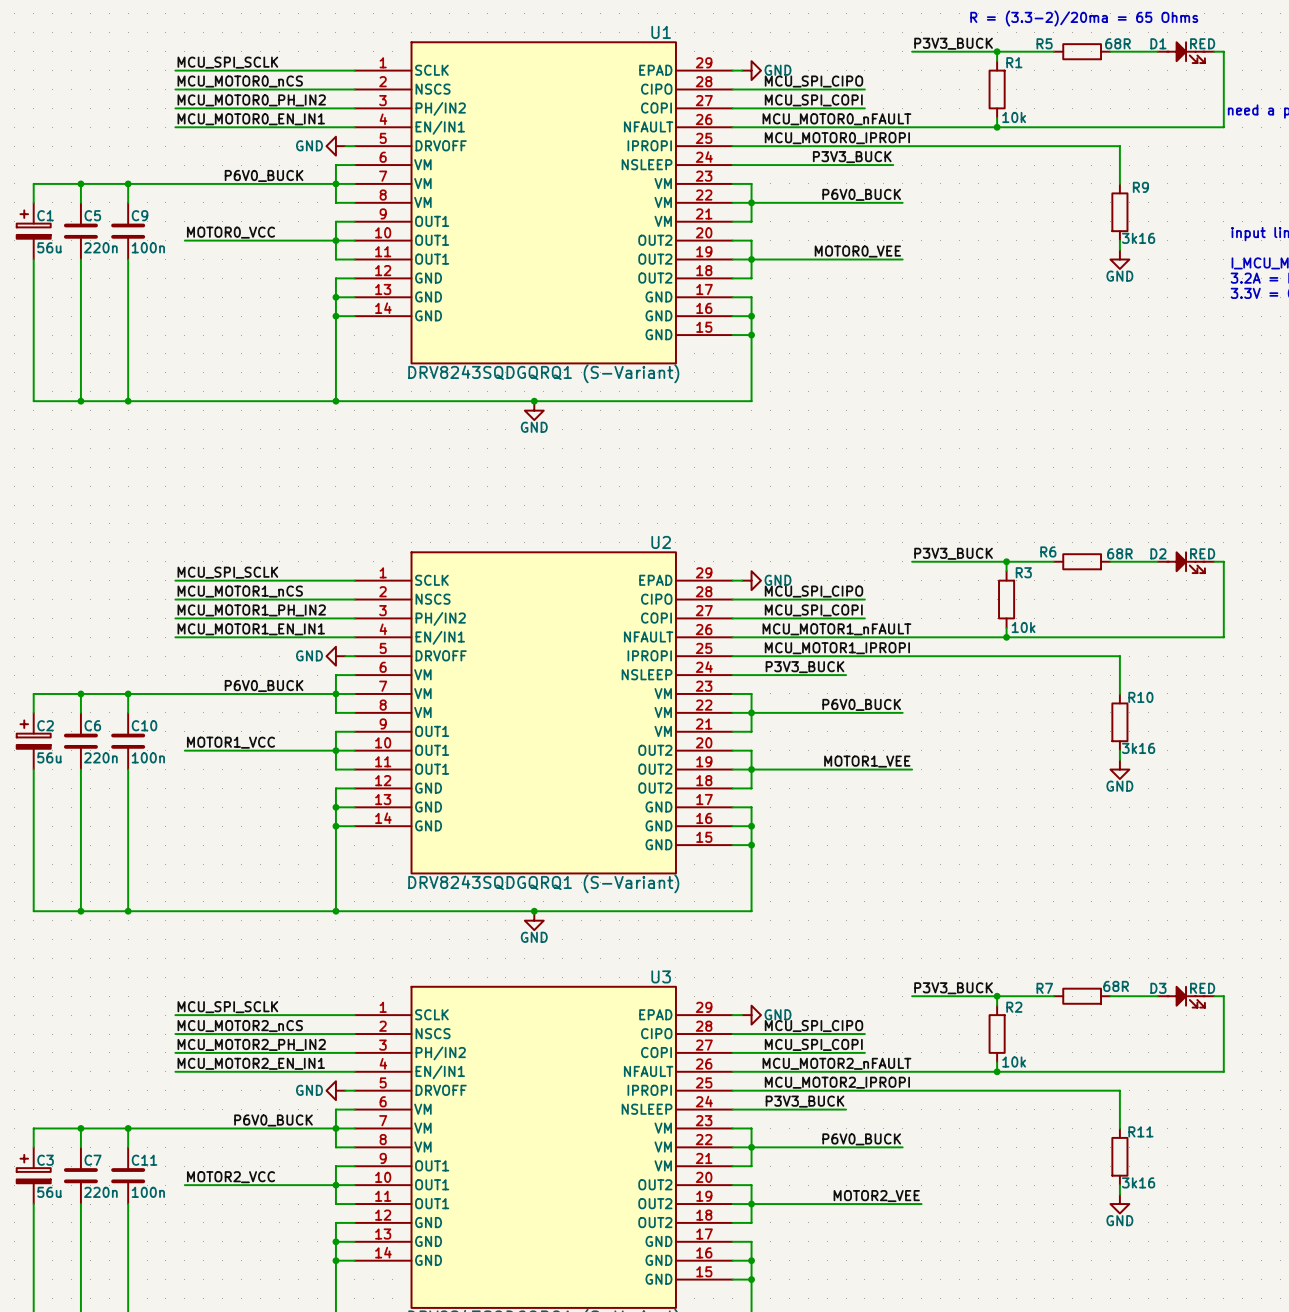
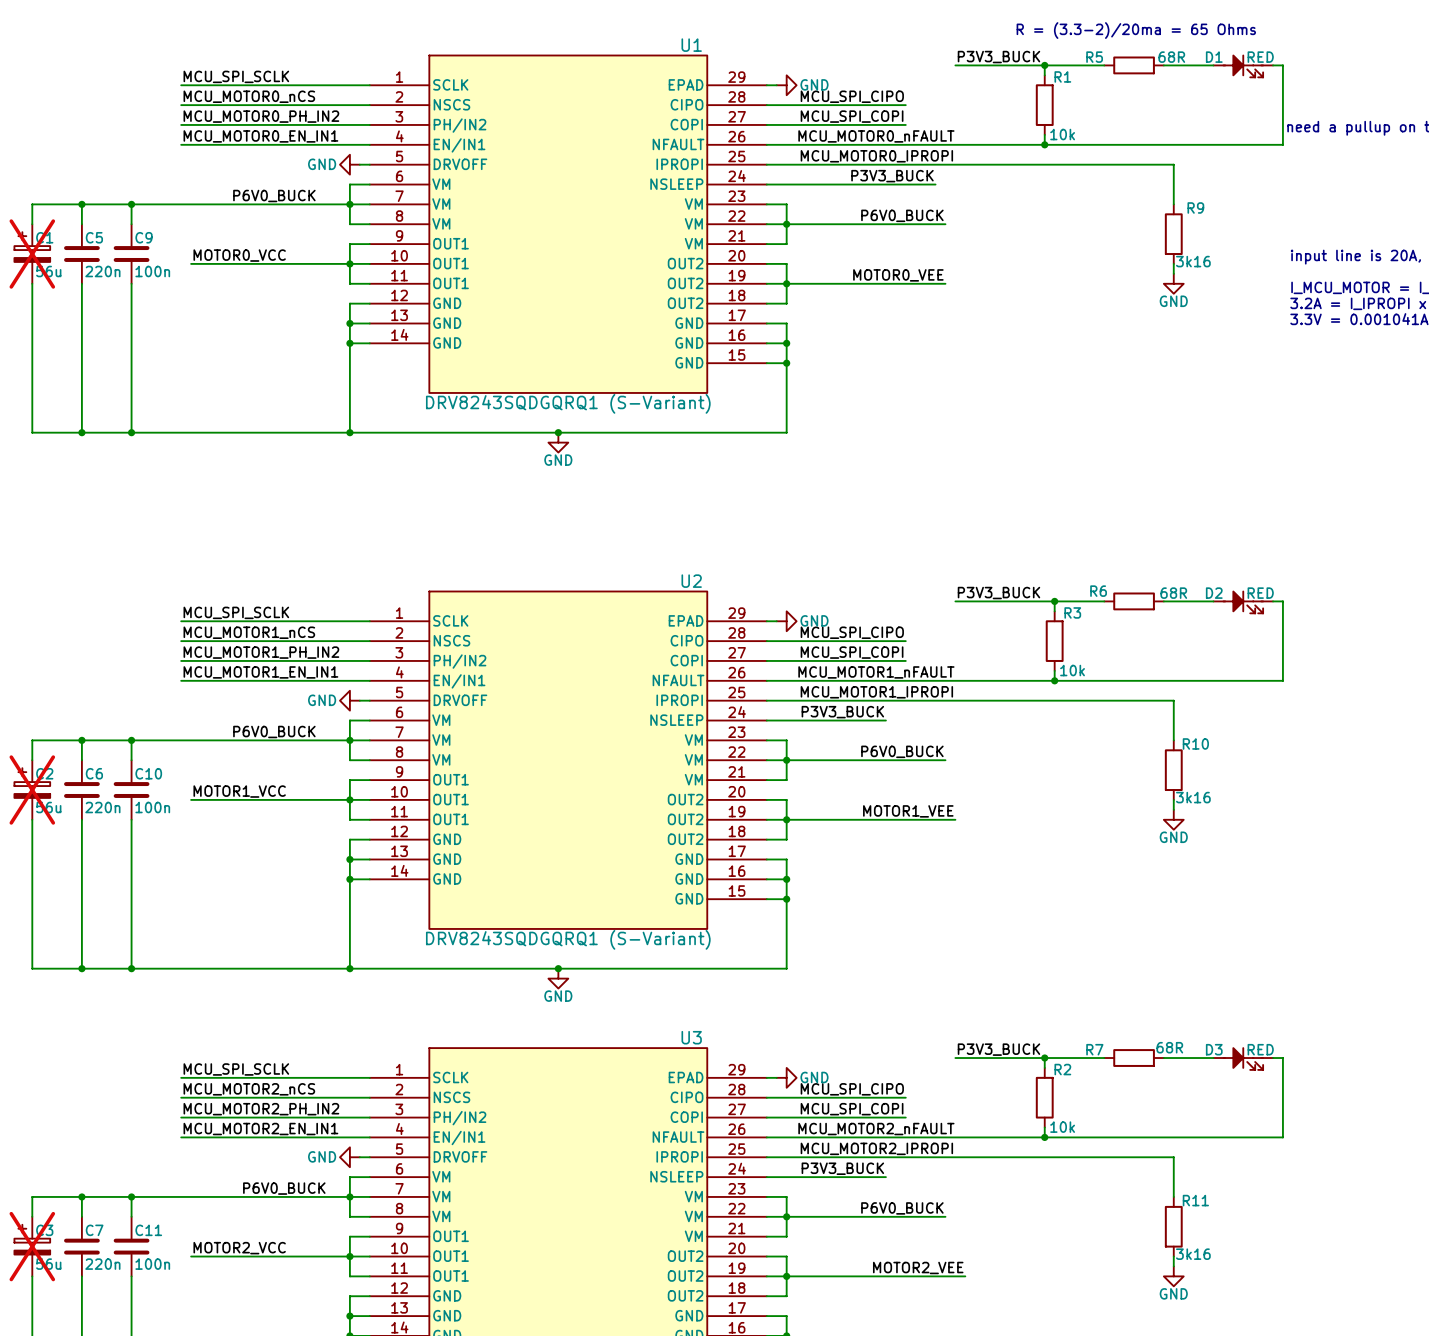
C1 do-not-place cross: none -> (32, 254)
C2 do-not-place cross: none -> (32, 790)
C3 do-not-place cross: none -> (32, 1246)

